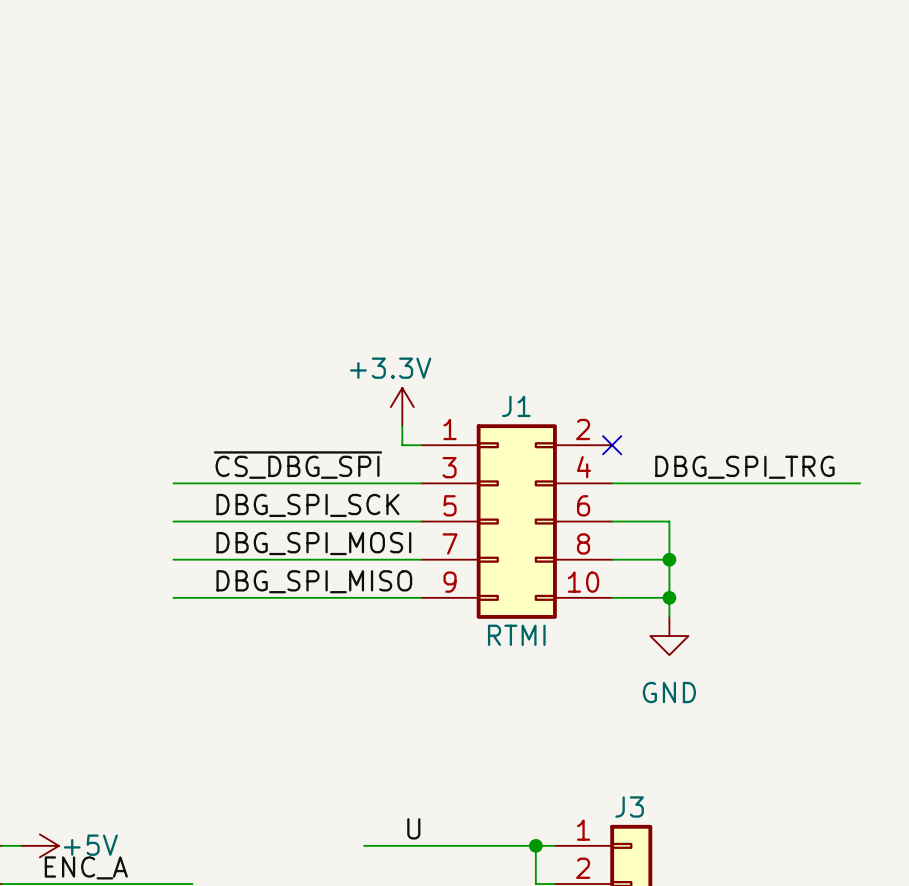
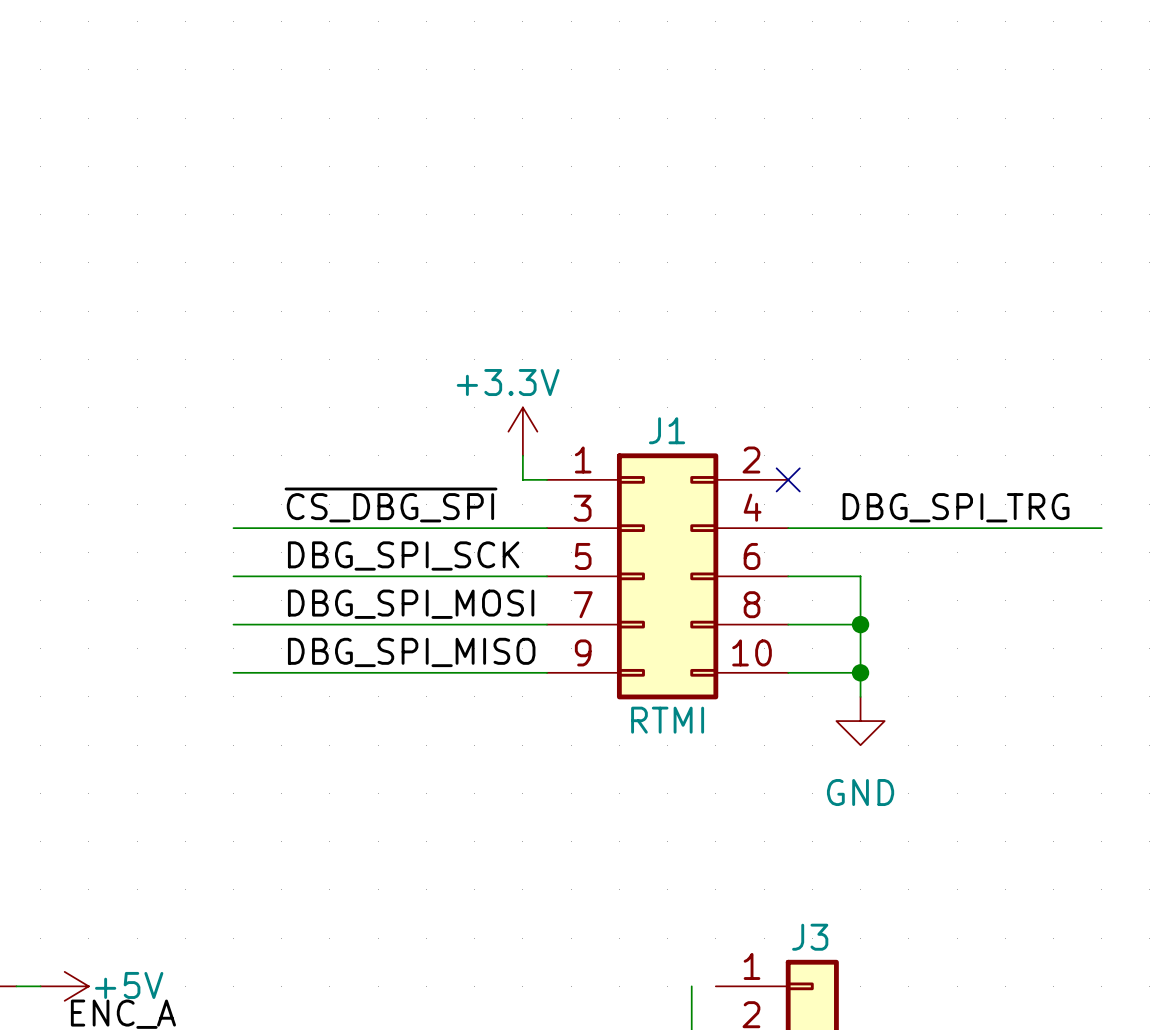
label: U (413, 828) -> none
wire: (364, 845) (554, 845) -> none
junction: (535, 845) -> none

